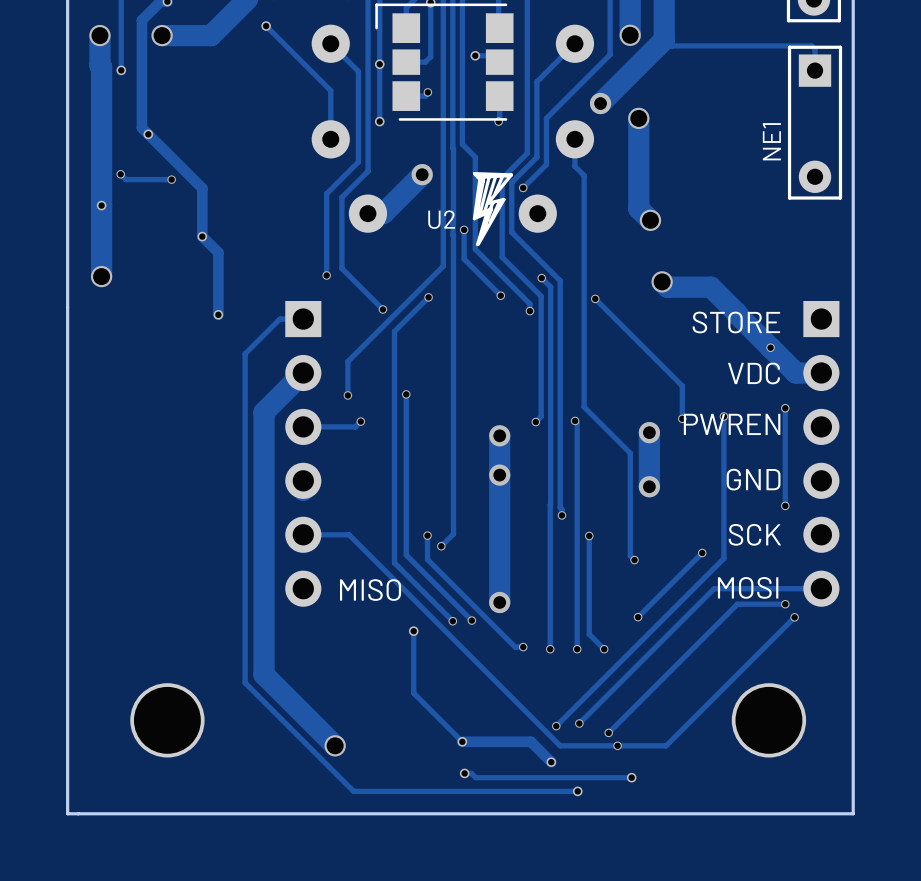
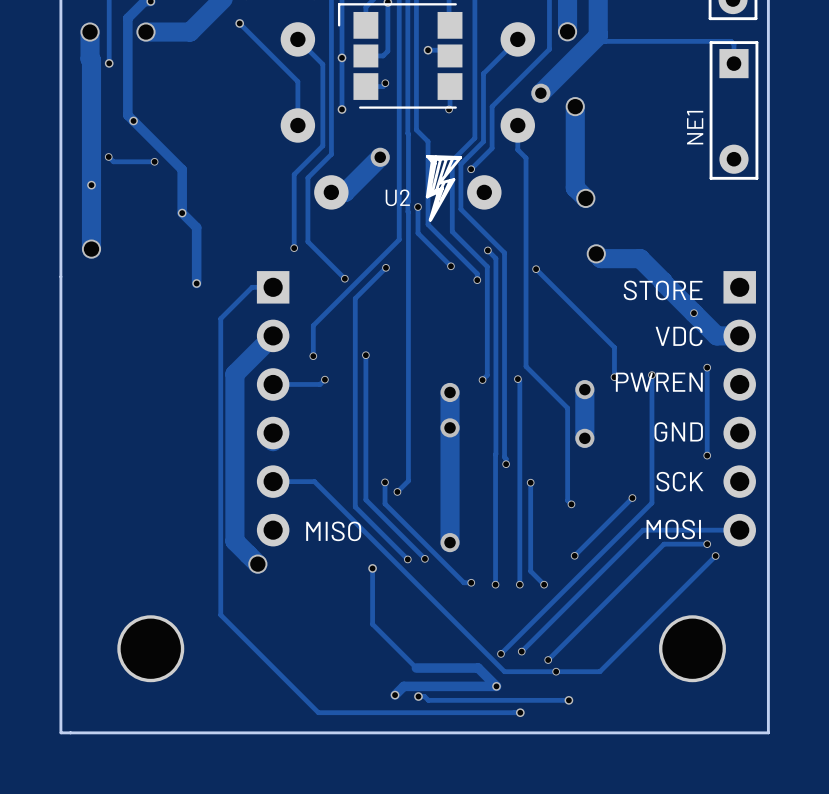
track: (264, 412) (264, 674) (335, 745) -> (237, 371) (234, 374) (234, 541) (257, 564)
via: none -> (257, 564)
via position: (462, 741) -> (395, 695)
via: (335, 745) -> none
track: none -> (496, 686) (403, 686) (395, 695)

